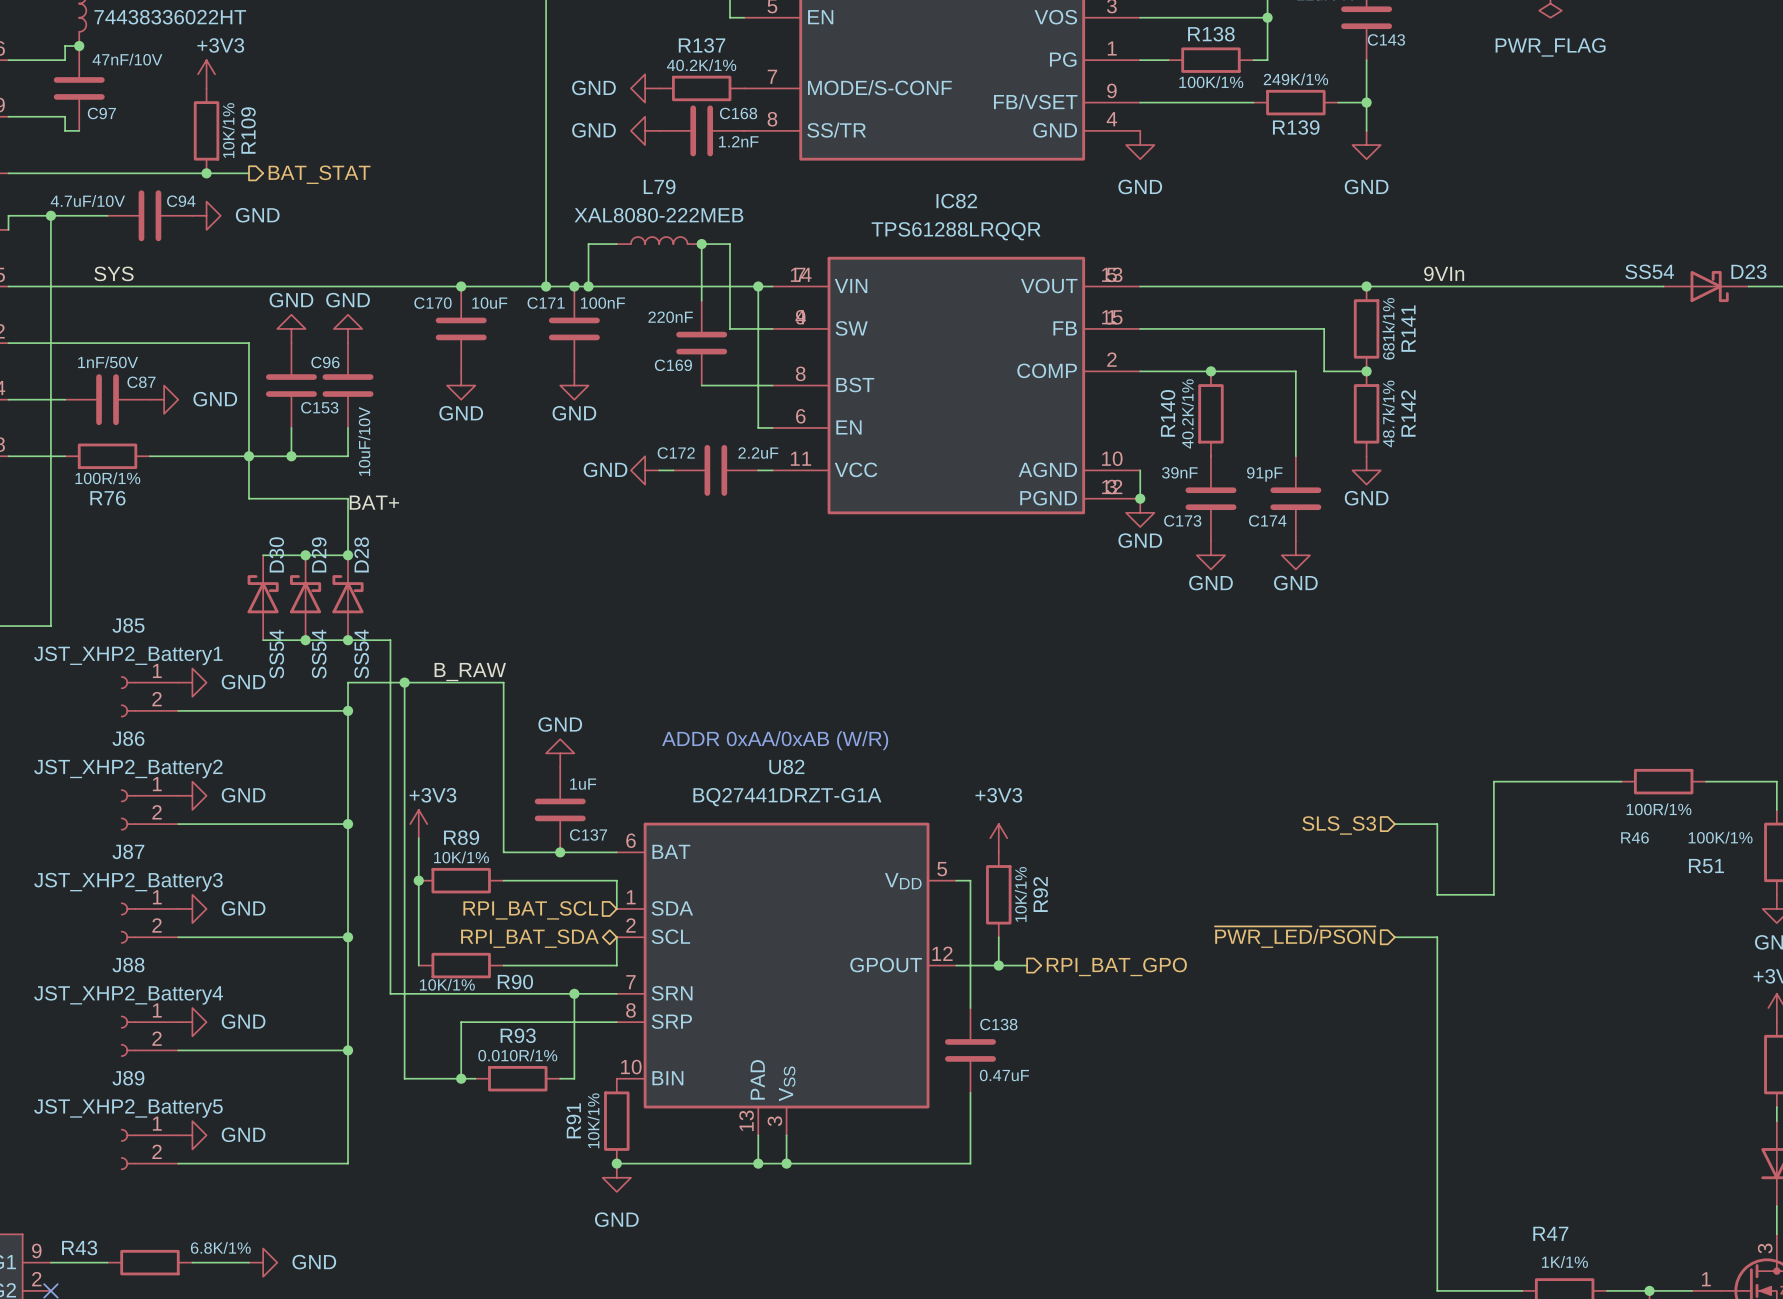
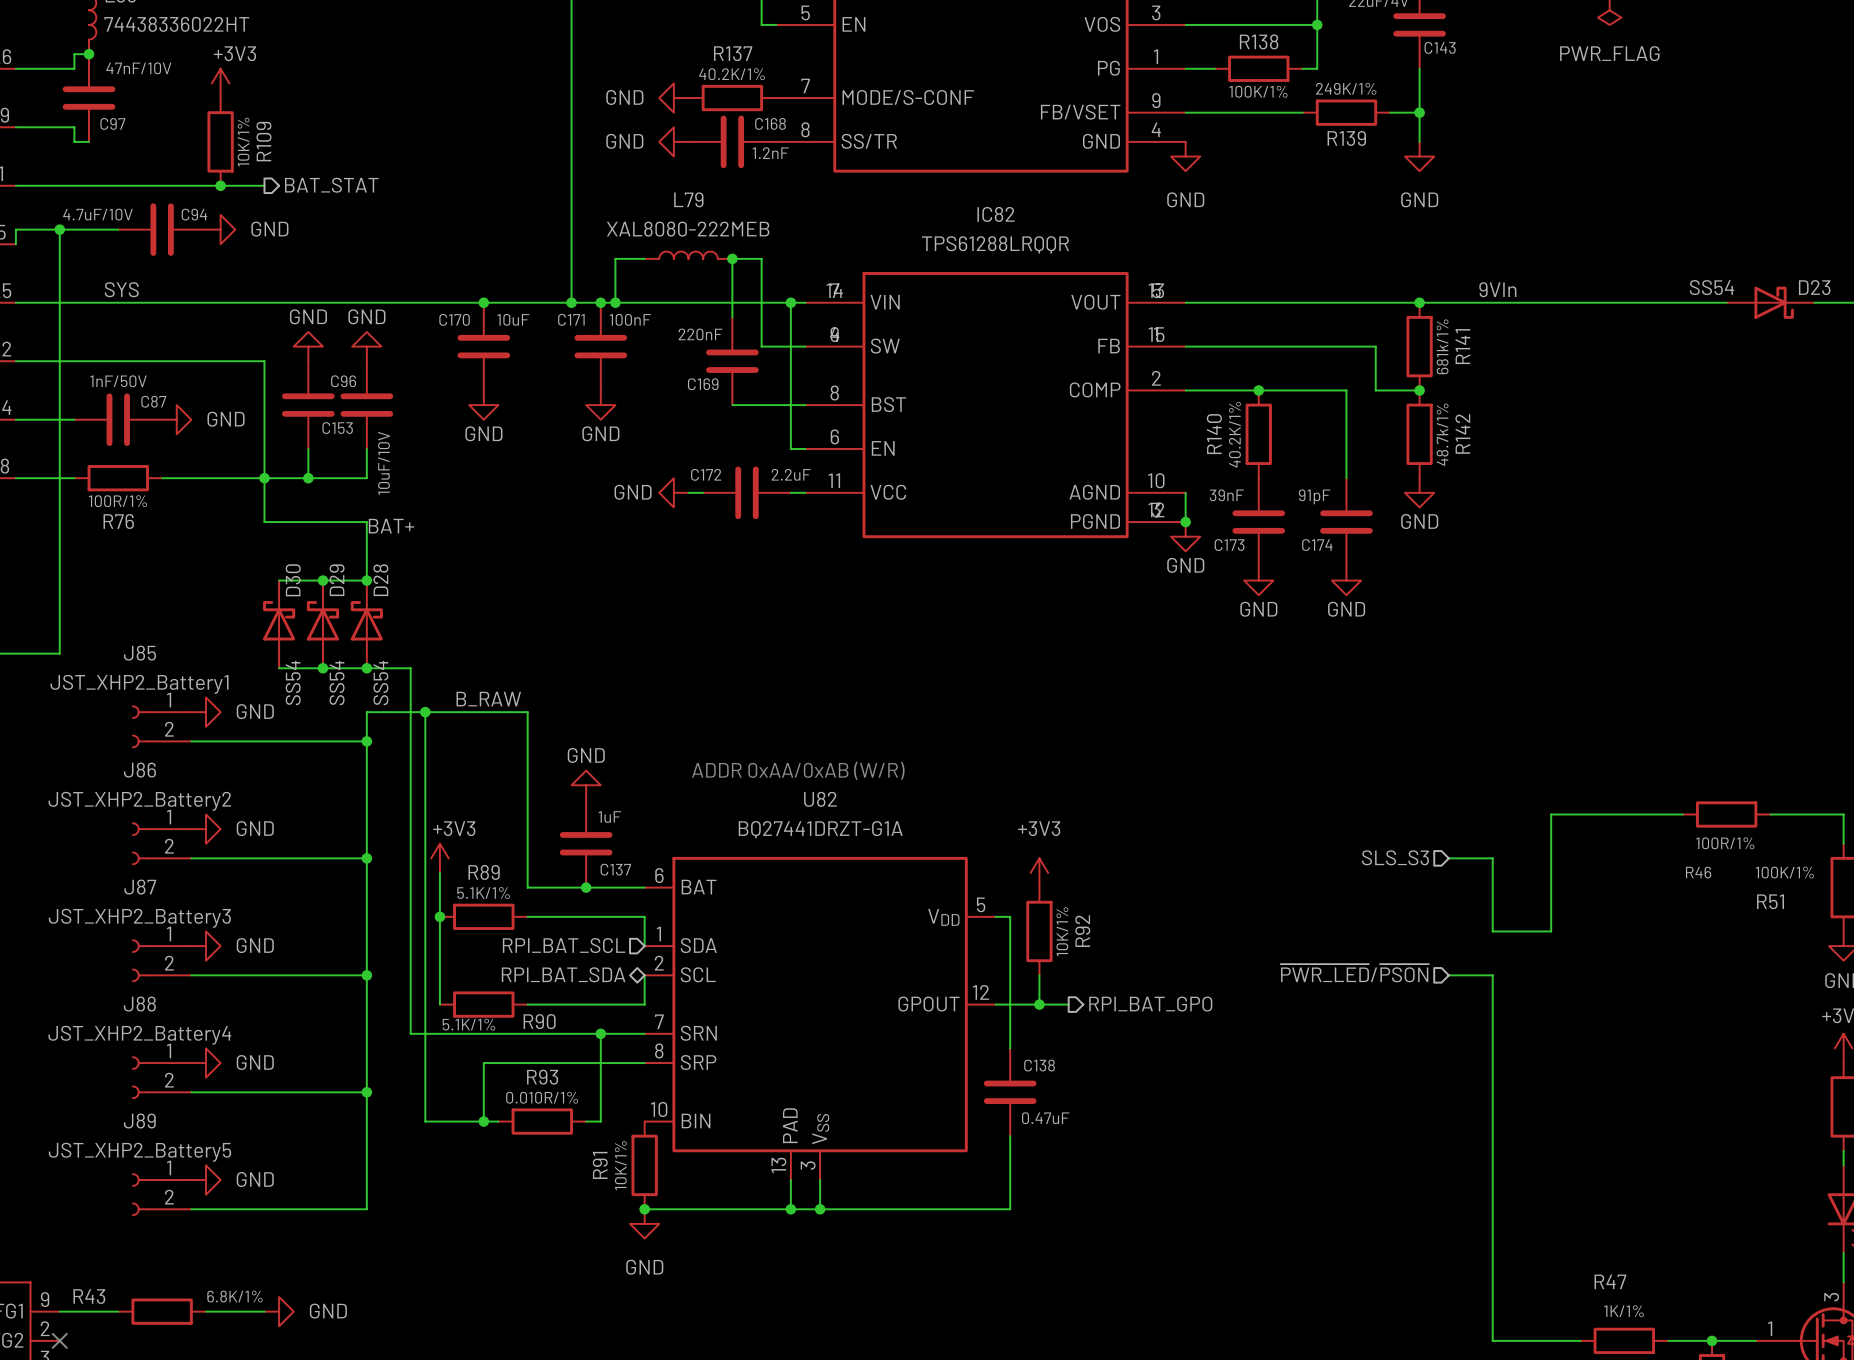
R89 value: 10K/1% (461, 857) -> 5.1K/1% (483, 893)
R90 value: 10K/1% (447, 984) -> 5.1K/1% (468, 1024)

